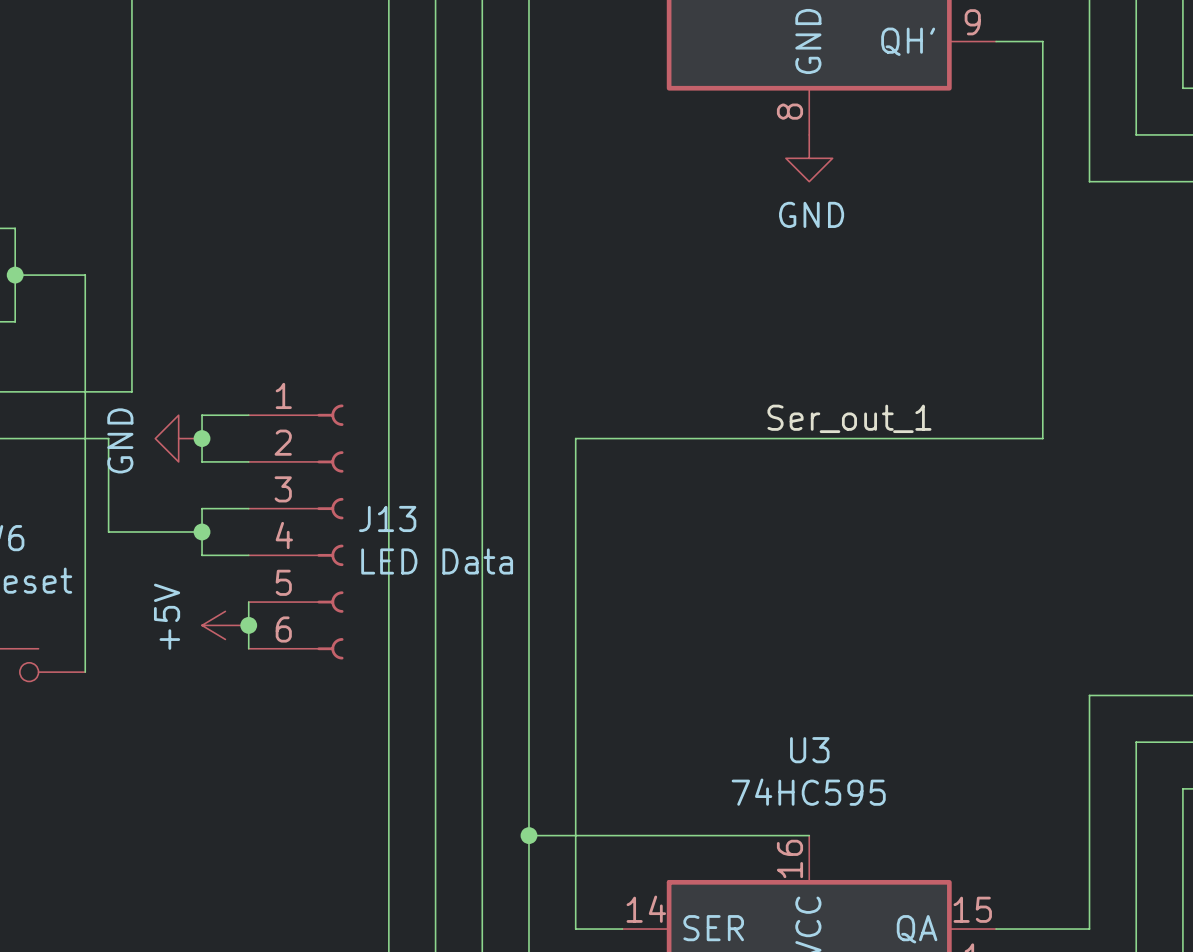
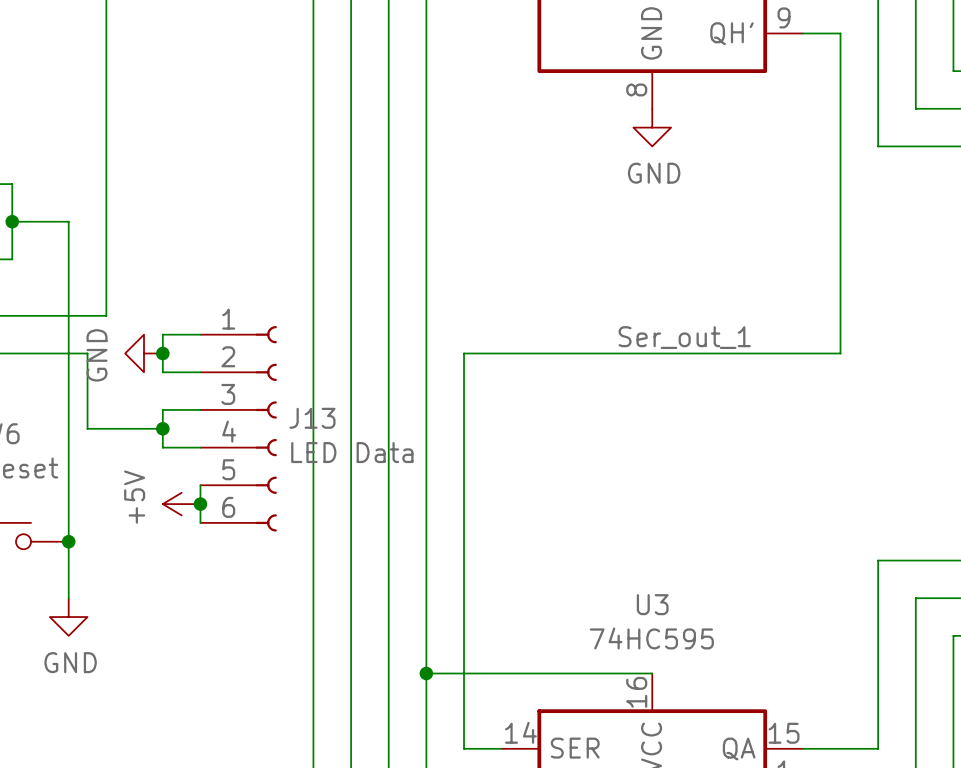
wire: none -> (68, 541) (68, 598)
junction: none -> (68, 541)
power symbol: none -> GND (68, 617)

